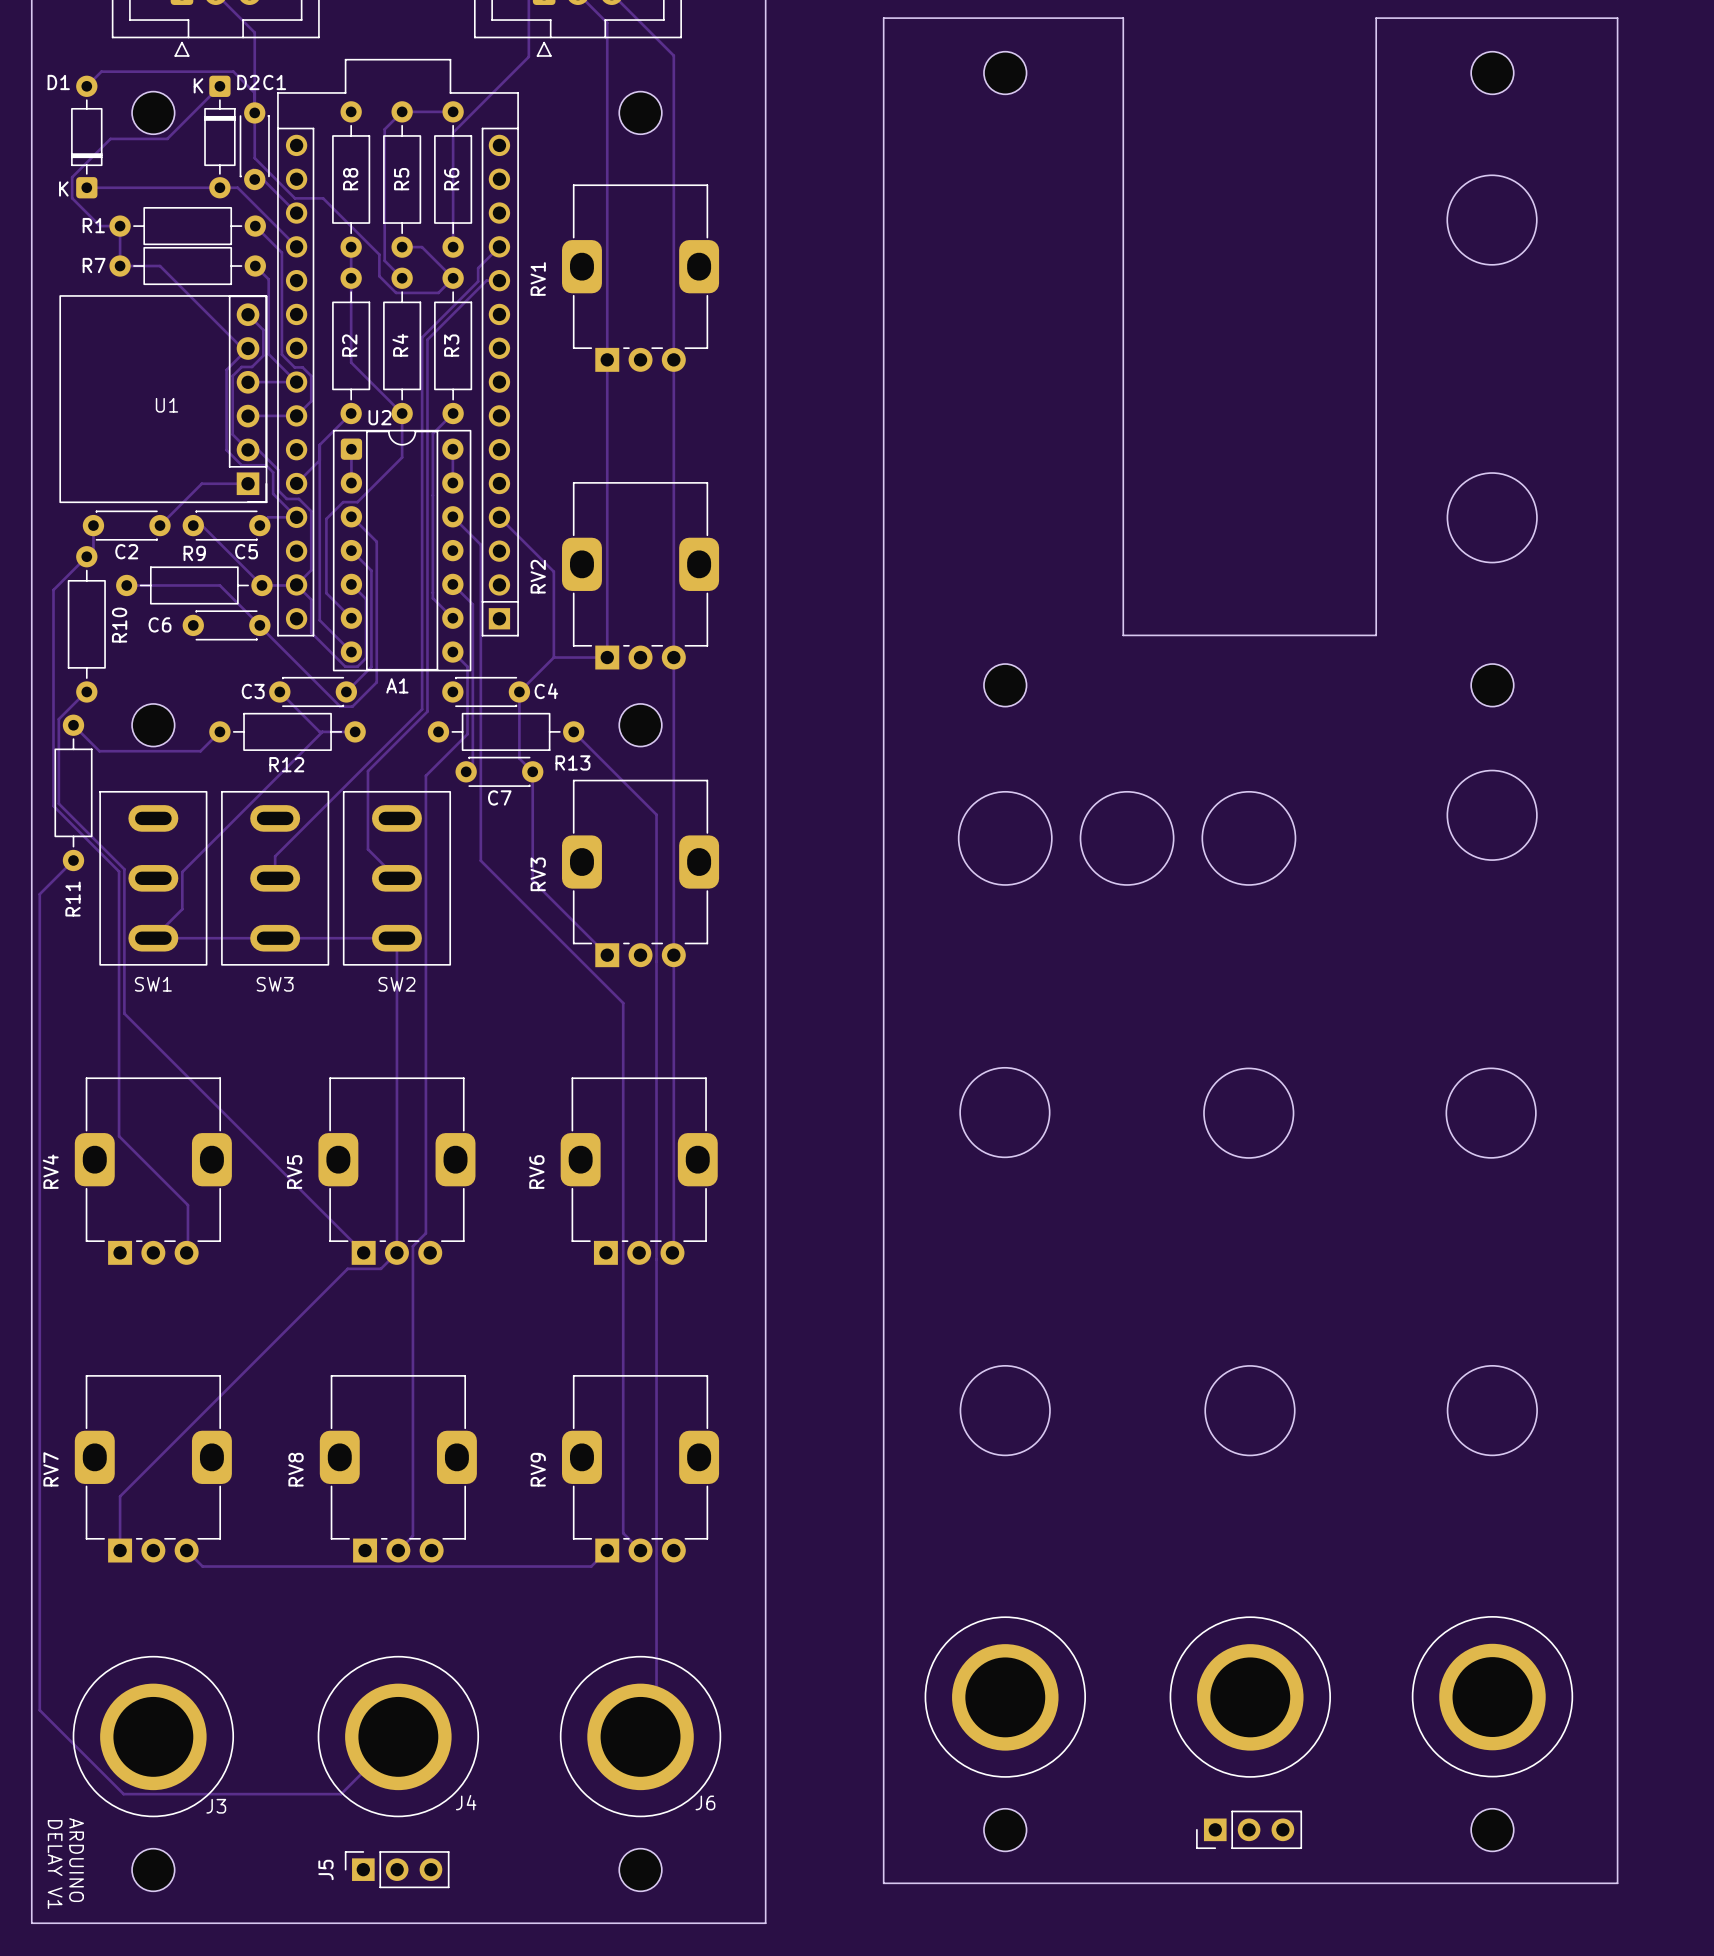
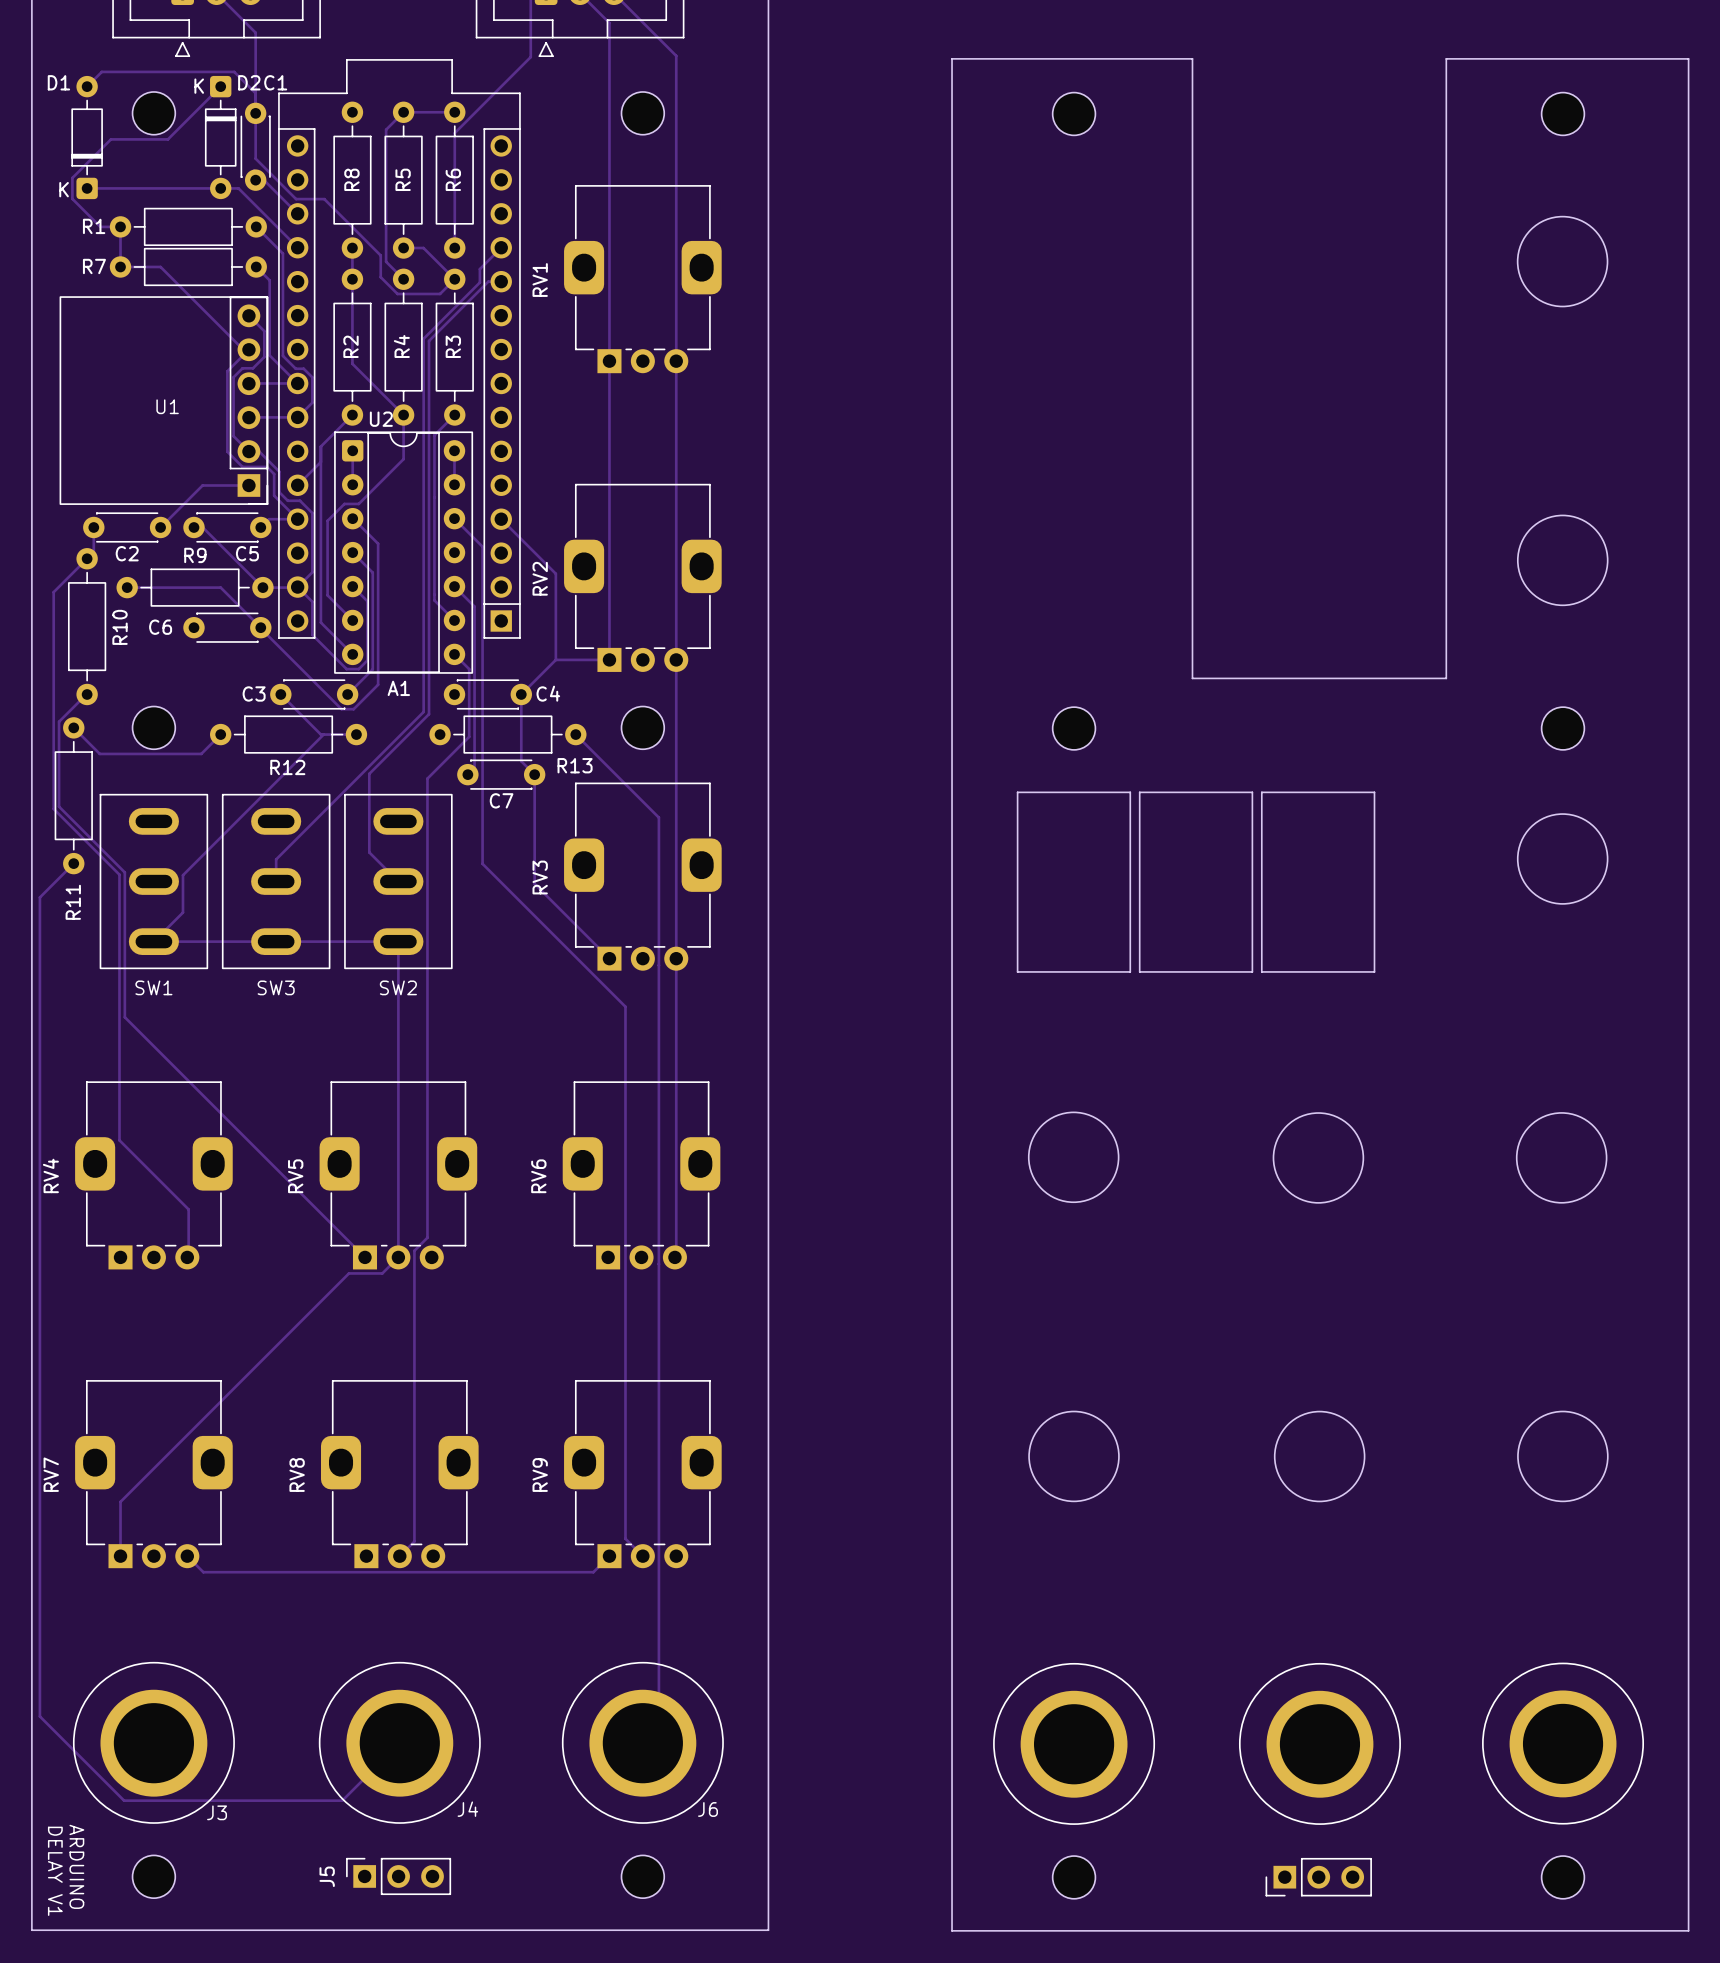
board edge: (883, 18) (1123, 18) (1123, 635) (1376, 635) (1376, 18) (1617, 18) (1617, 1883) (883, 1883) (883, 18) -> (952, 58) (1192, 58) (1192, 678) (1446, 678) (1446, 58) (1688, 58) (1688, 1930) (952, 1930) (952, 58)
part position: (1005, 73) -> (1074, 113)
part position: (1492, 73) -> (1562, 113)
round board edge position: (1492, 220) -> (1562, 261)
round board edge position: (1492, 517) -> (1562, 560)
part position: (1005, 685) -> (1074, 728)
part position: (1492, 685) -> (1562, 728)
board edge: none -> (1017, 792) (1130, 792) (1130, 971) (1017, 971) (1017, 792)
board edge: none -> (1139, 792) (1252, 792) (1252, 971) (1139, 971) (1139, 792)
board edge: none -> (1261, 792) (1374, 792) (1374, 971) (1261, 971) (1261, 792)
round board edge: [958, 791, 1053, 886] -> none
round board edge: [1080, 791, 1175, 886] -> none
round board edge: [1201, 791, 1296, 886] -> none
round board edge position: (1492, 815) -> (1562, 858)
round board edge position: (1004, 1112) -> (1073, 1157)
round board edge position: (1248, 1113) -> (1318, 1157)
round board edge position: (1491, 1113) -> (1561, 1157)
round board edge position: (1005, 1410) -> (1073, 1456)
round board edge position: (1249, 1410) -> (1319, 1456)
round board edge position: (1492, 1410) -> (1562, 1456)
part position: (1492, 1696) -> (1563, 1743)
part position: (1005, 1697) -> (1074, 1743)
part position: (1250, 1697) -> (1319, 1743)
part position: (1249, 1829) -> (1318, 1877)
part position: (1005, 1830) -> (1074, 1877)
part position: (1492, 1830) -> (1562, 1877)

